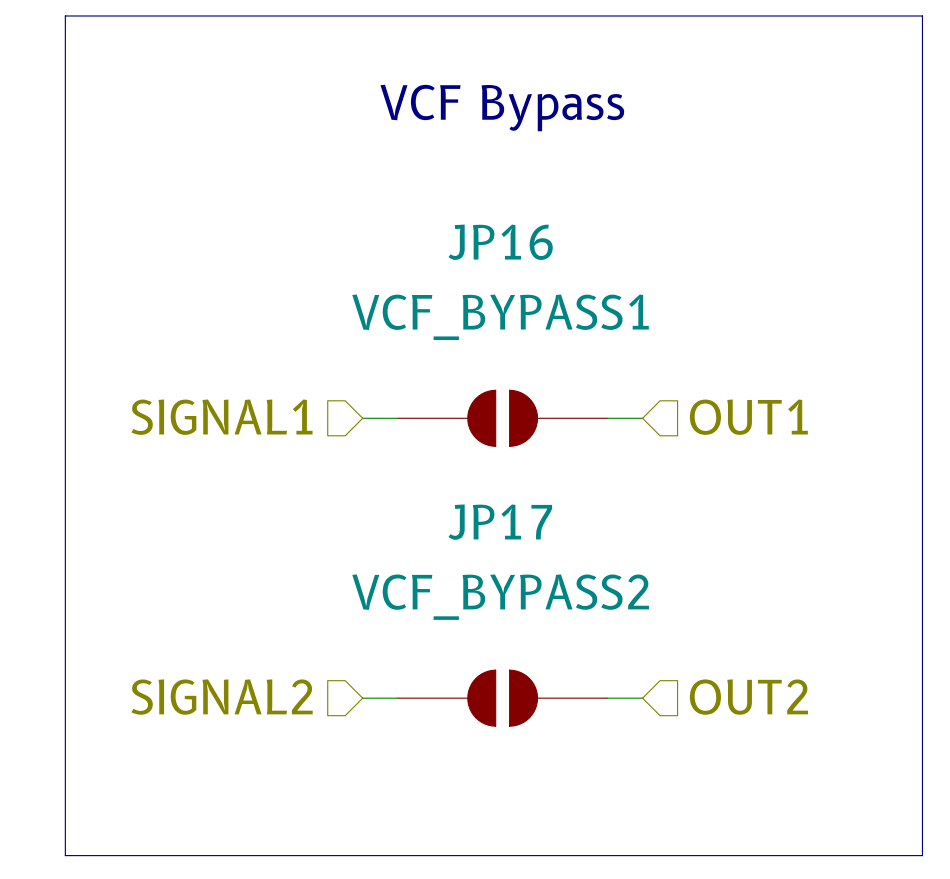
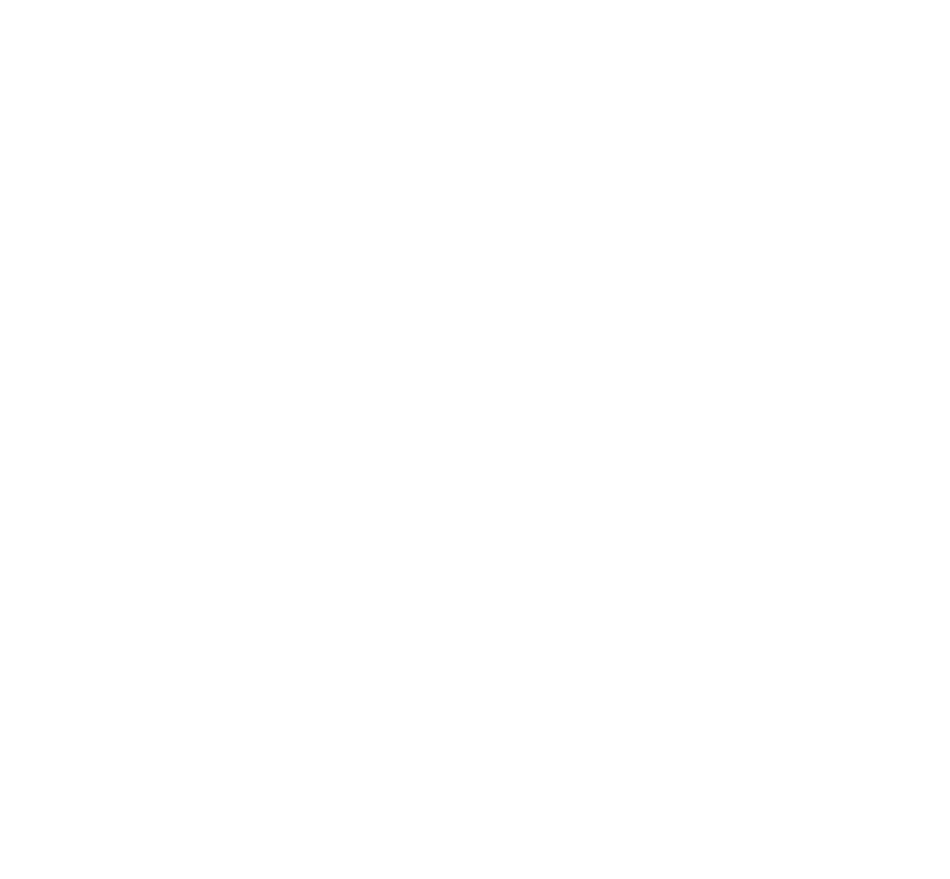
line: (65, 15) (922, 15) (922, 855) (65, 855) (65, 15) -> none
text: VCF Bypass (502, 108) -> none
hierarchical label: SIGNAL1 (221, 417) -> none
hierarchical label: OUT1 (748, 417) -> none
wire: (362, 418) (397, 418) -> none
JP16: VCF_BYPASS1 (502, 418) -> none
wire: (607, 418) (642, 418) -> none
hierarchical label: SIGNAL2 (222, 697) -> none
hierarchical label: OUT2 (748, 697) -> none
wire: (362, 698) (397, 698) -> none
JP17: VCF_BYPASS2 (502, 698) -> none
wire: (607, 698) (642, 698) -> none

